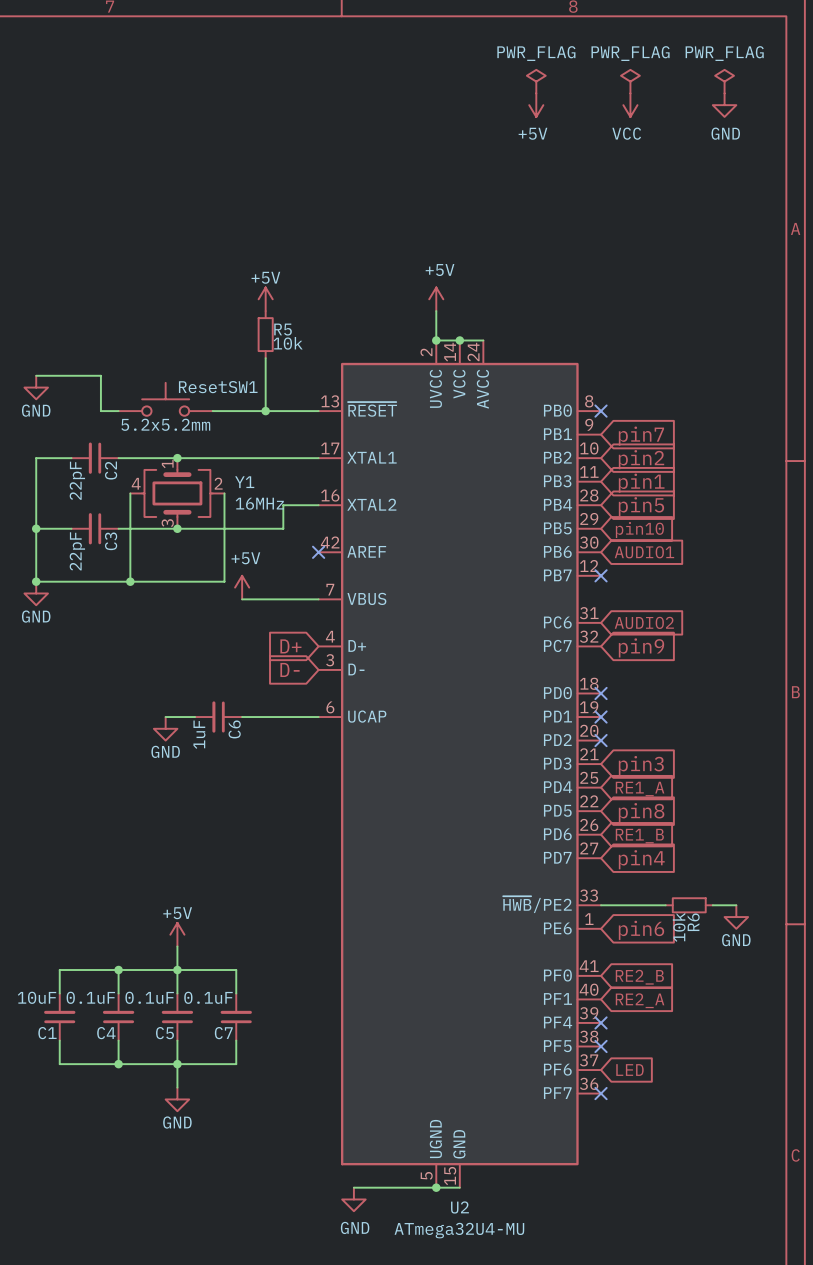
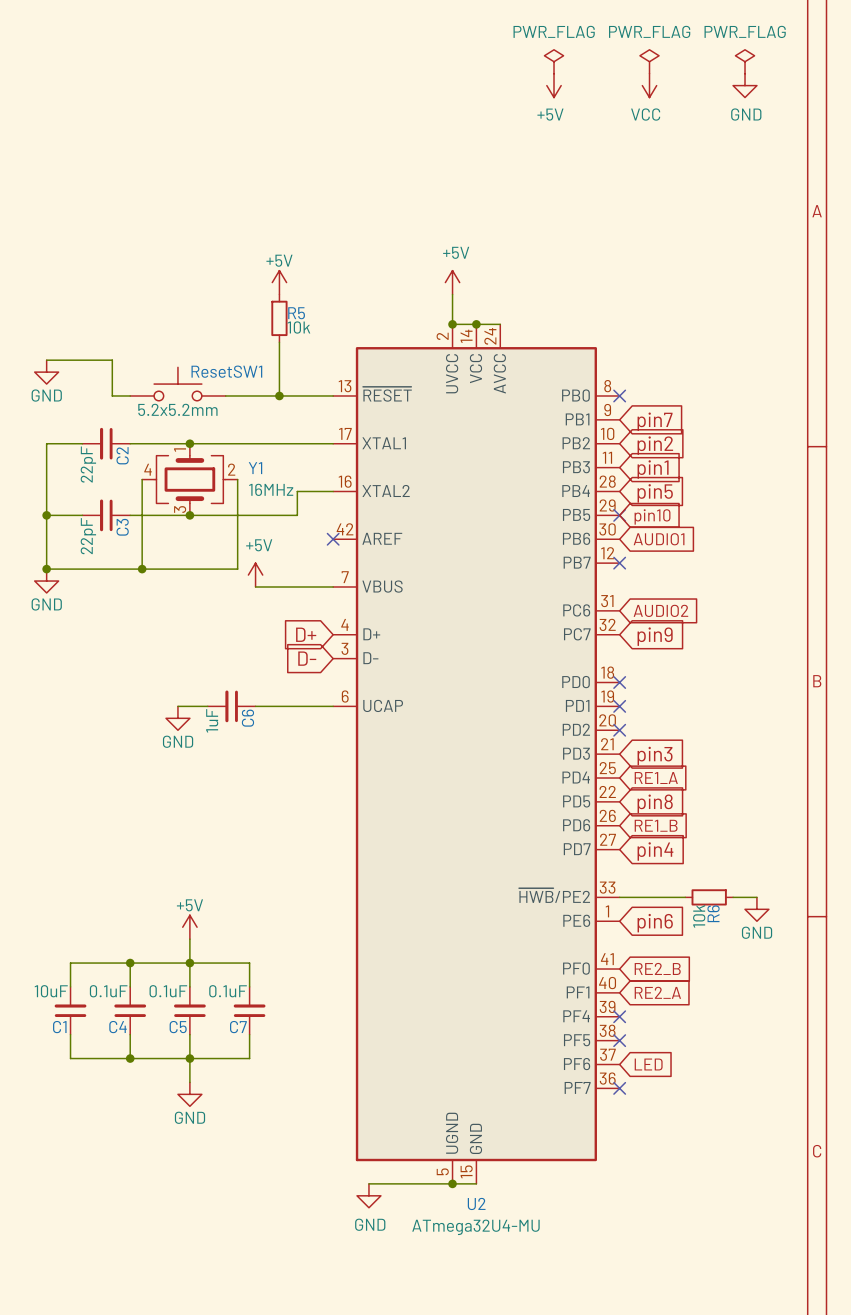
no-connect mark: none -> (619, 515)

